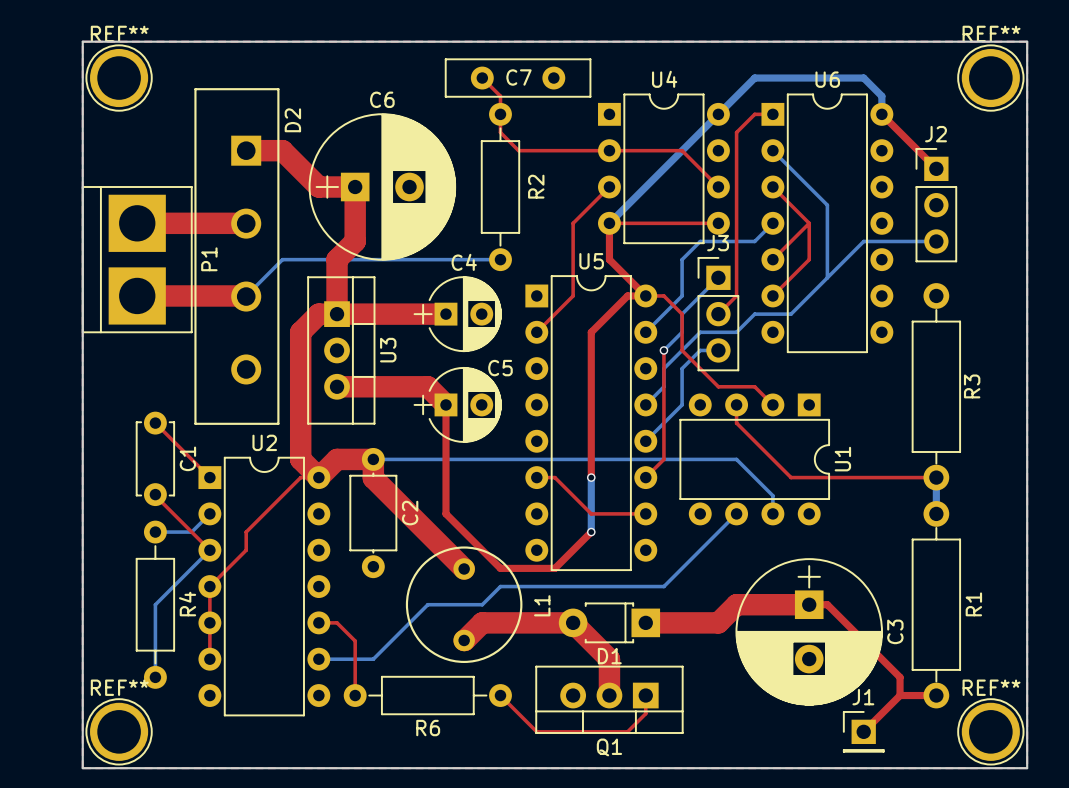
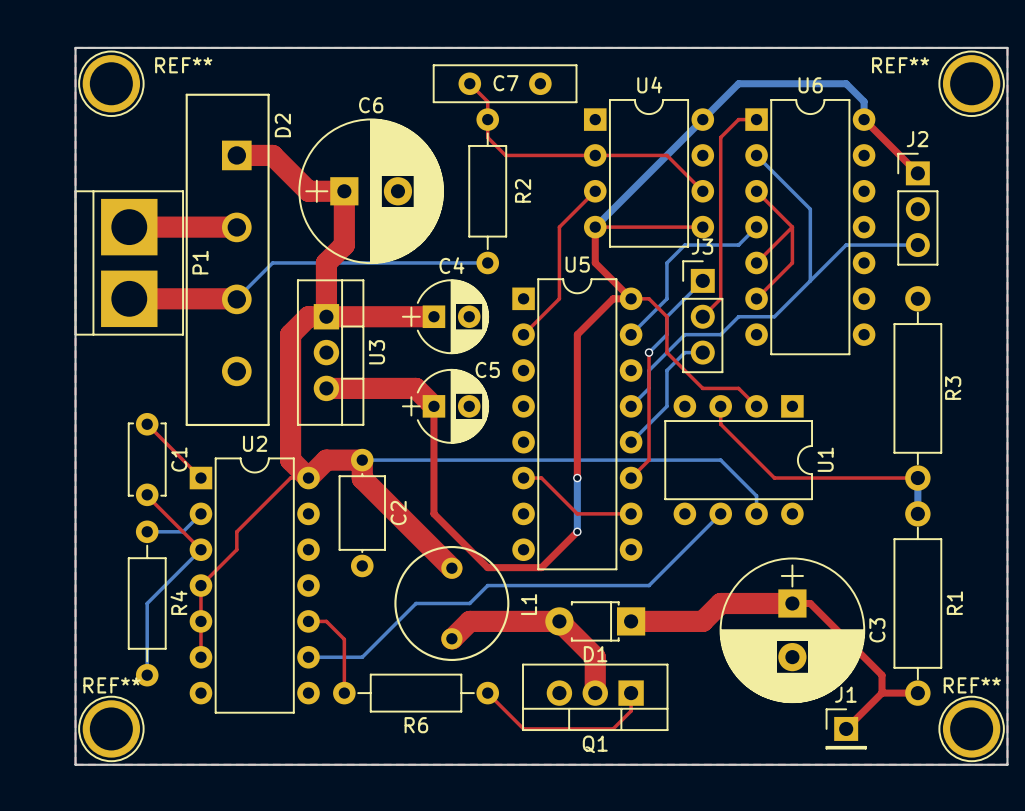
REF** name position: REF** (119, 33) -> REF** (183, 65)
REF** name position: REF** (991, 33) -> REF** (900, 65)

